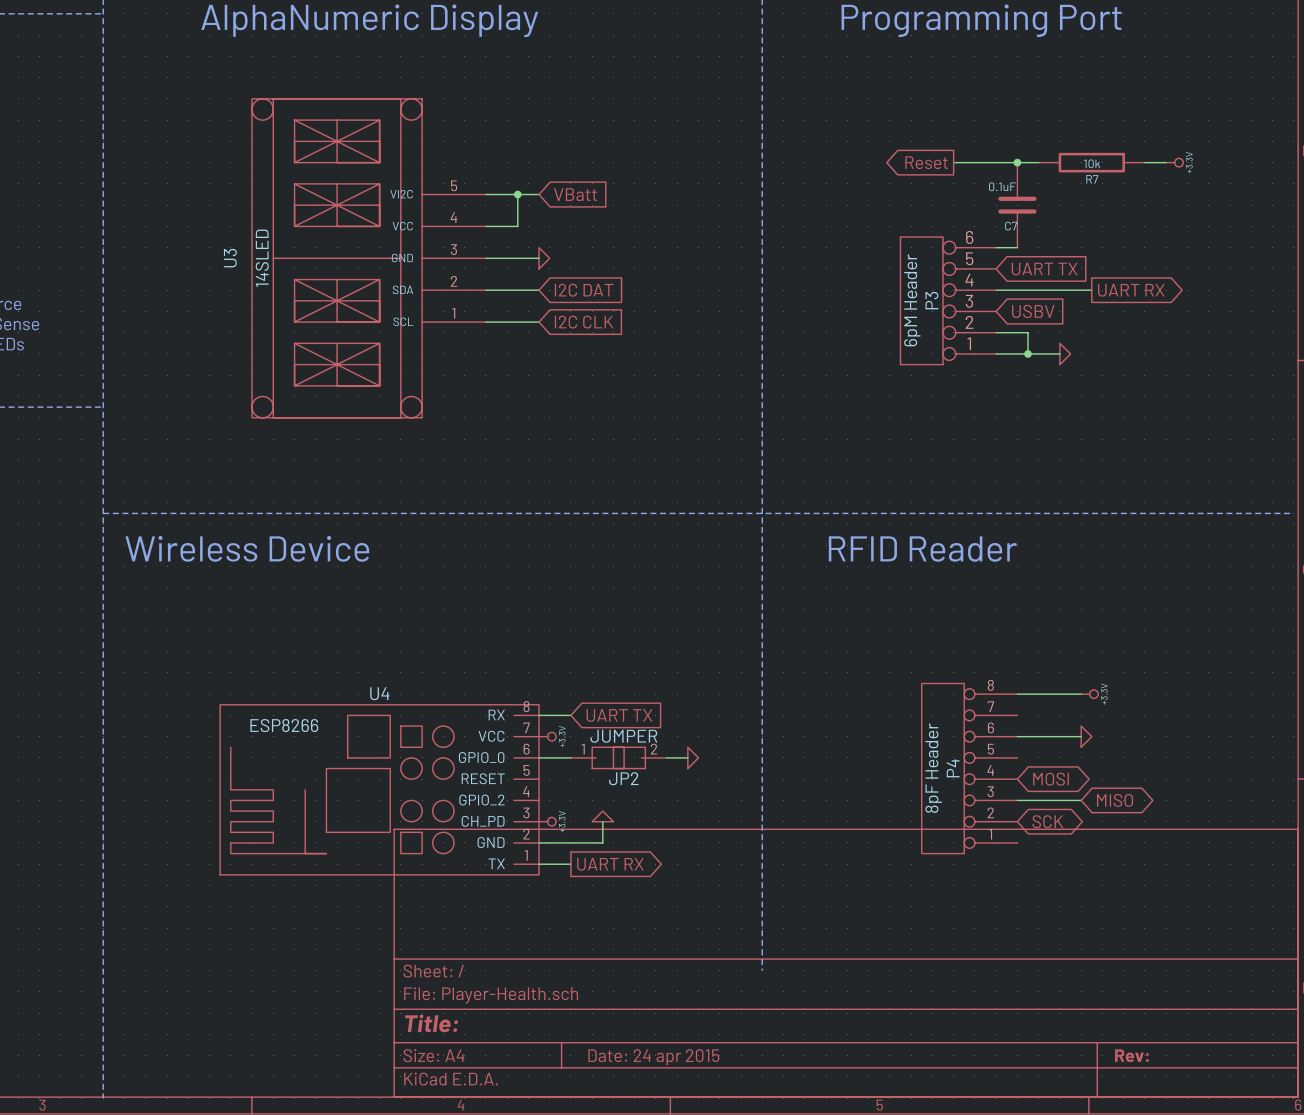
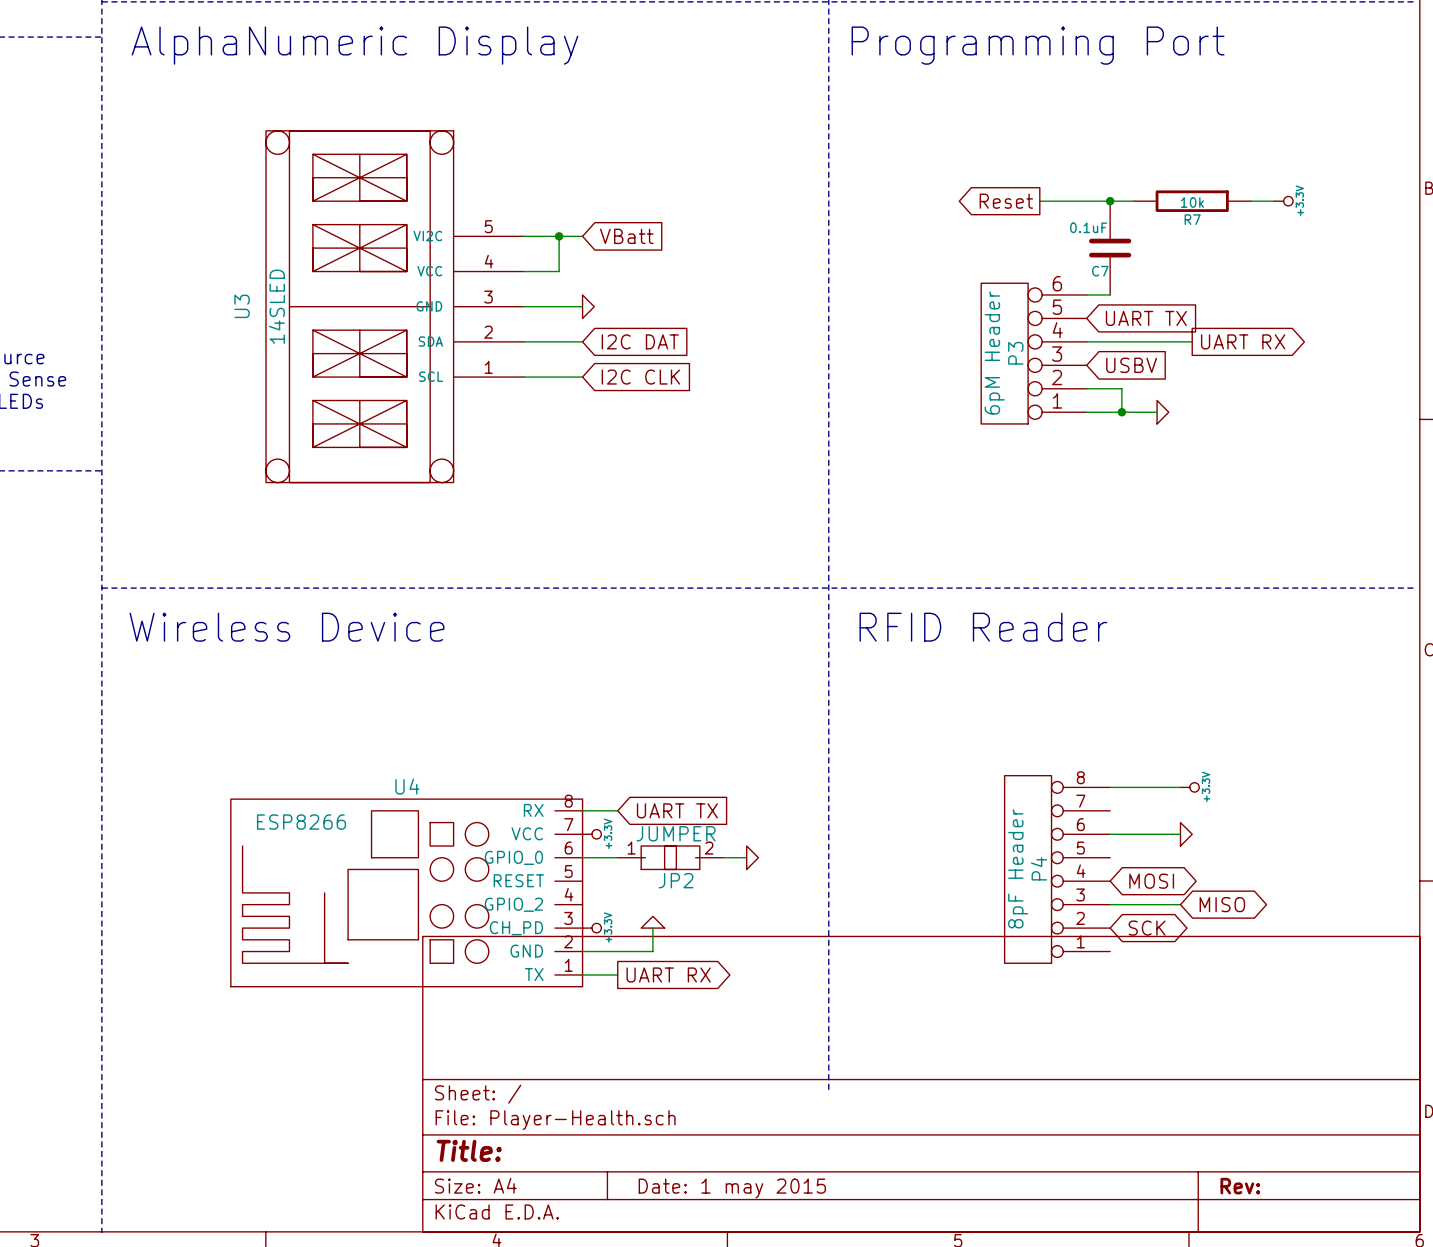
title block: Date: 24 apr 2015 (653, 1057) -> Date: 1 may 2015 (732, 1188)

